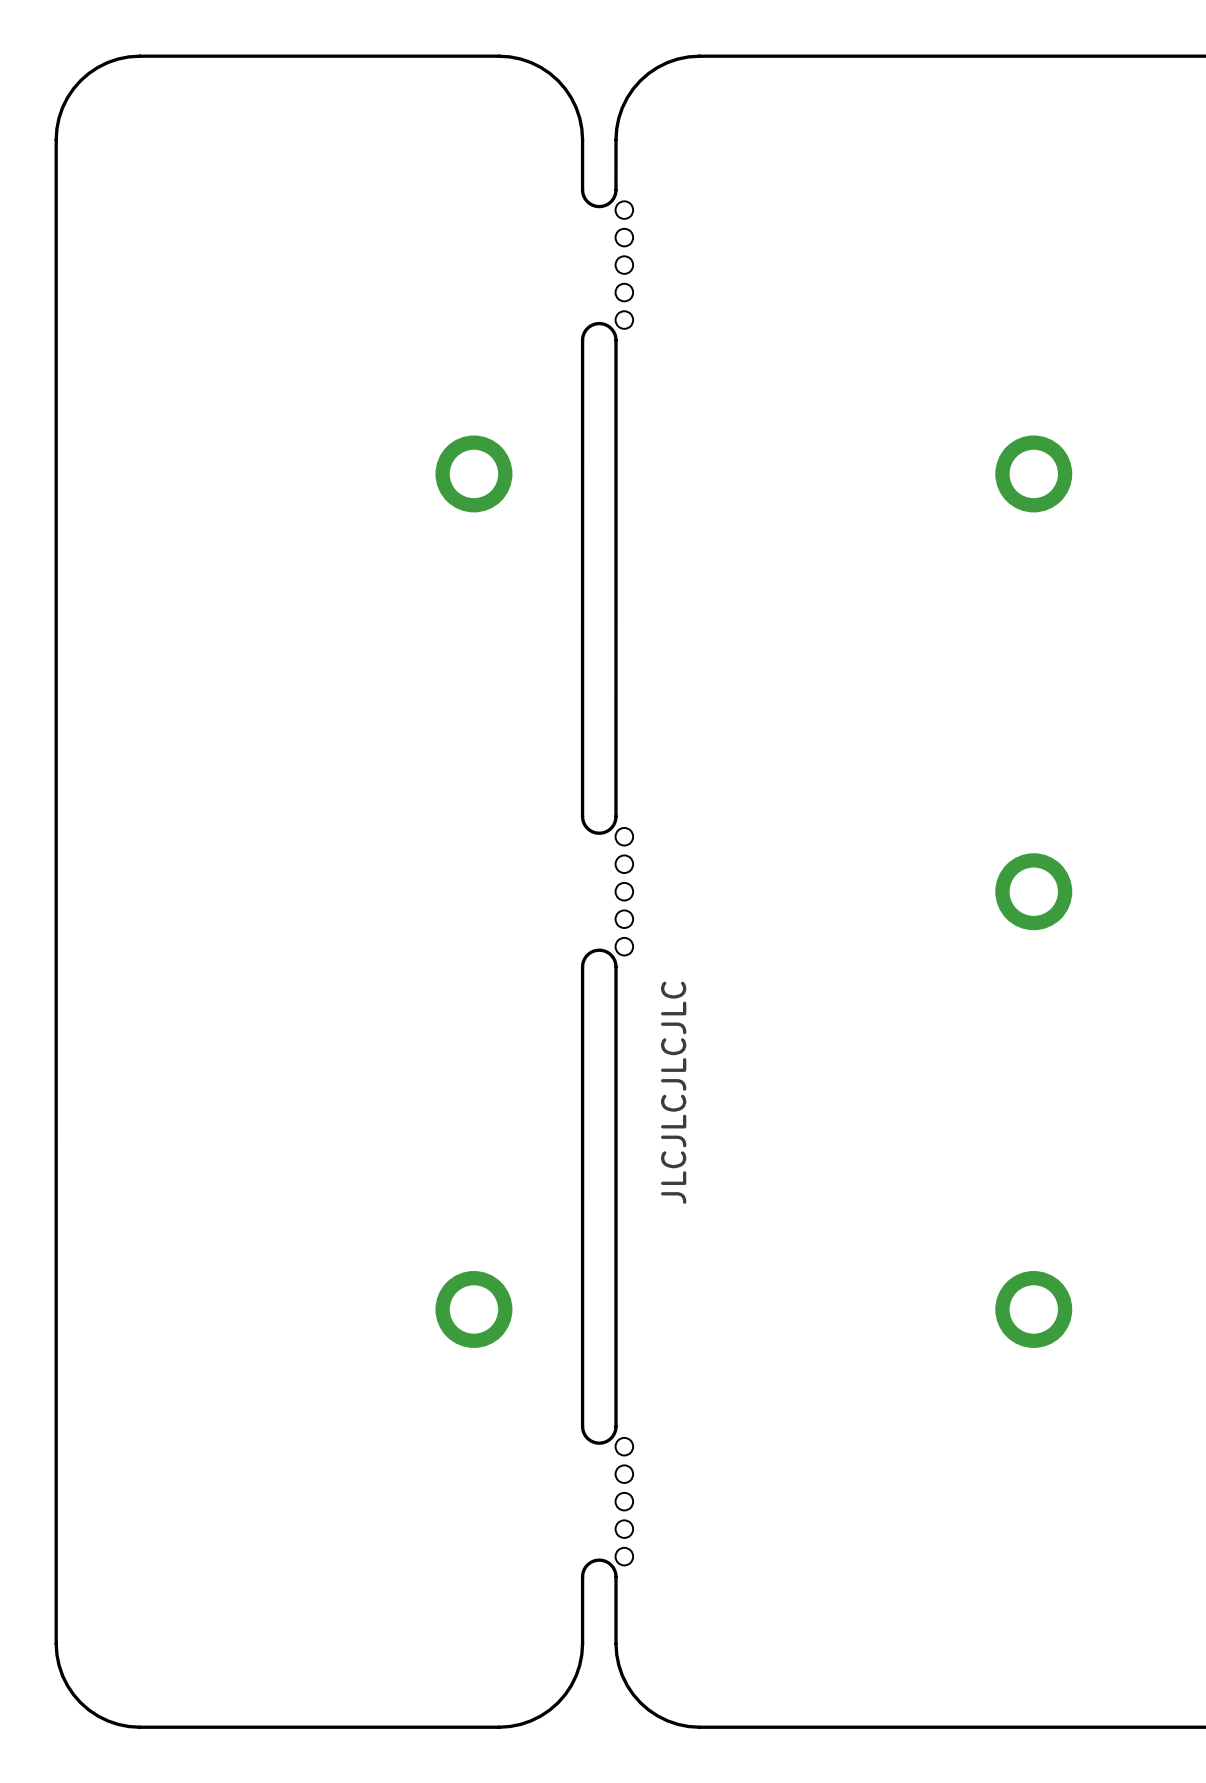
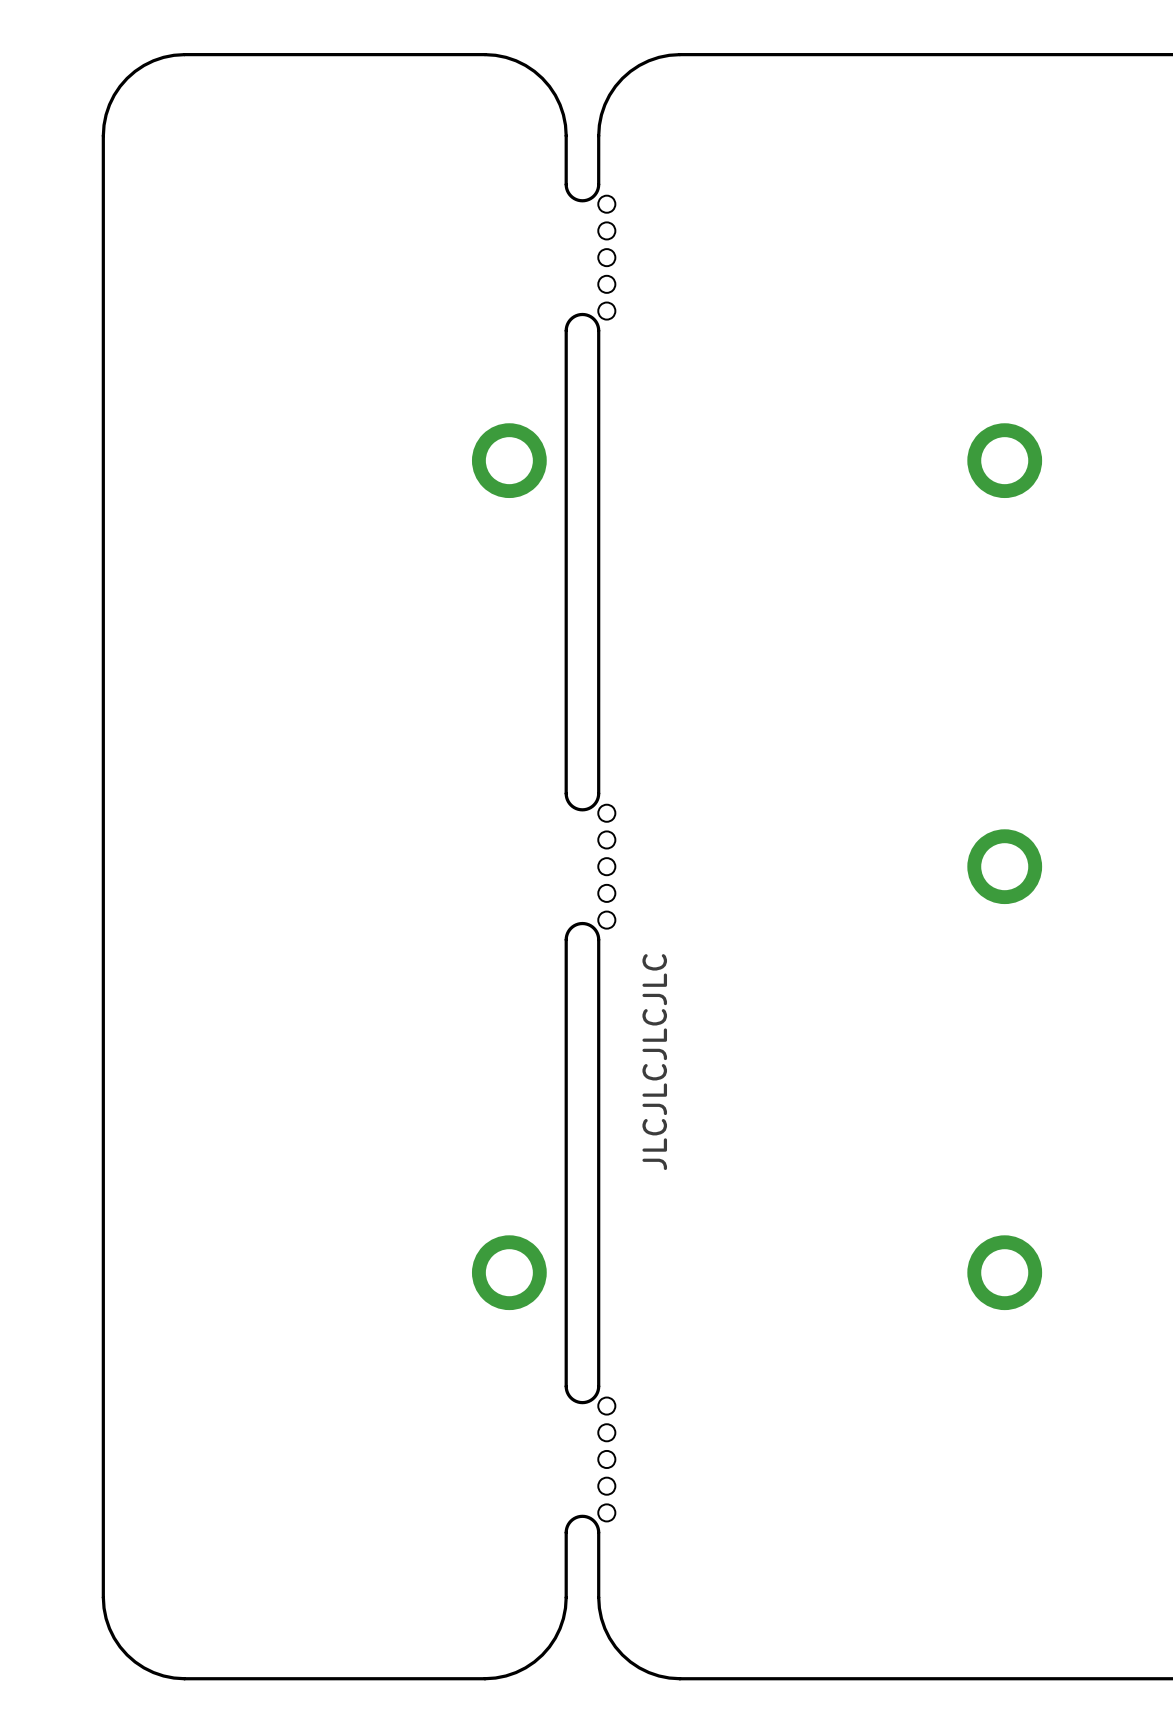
board edge: (189, 56) (128, 56) (97, 67) (80, 80) (67, 97) (59, 118) (56, 139) (56, 1654) (62, 1675) (73, 1694) (97, 1716) (128, 1726) (189, 1727) -> (184, 54) (153, 60) (127, 78) (109, 104) (103, 135) (103, 1597) (109, 1628) (127, 1654) (153, 1672) (184, 1678)
part position: (473, 473) -> (509, 460)
part position: (473, 1309) -> (509, 1272)

